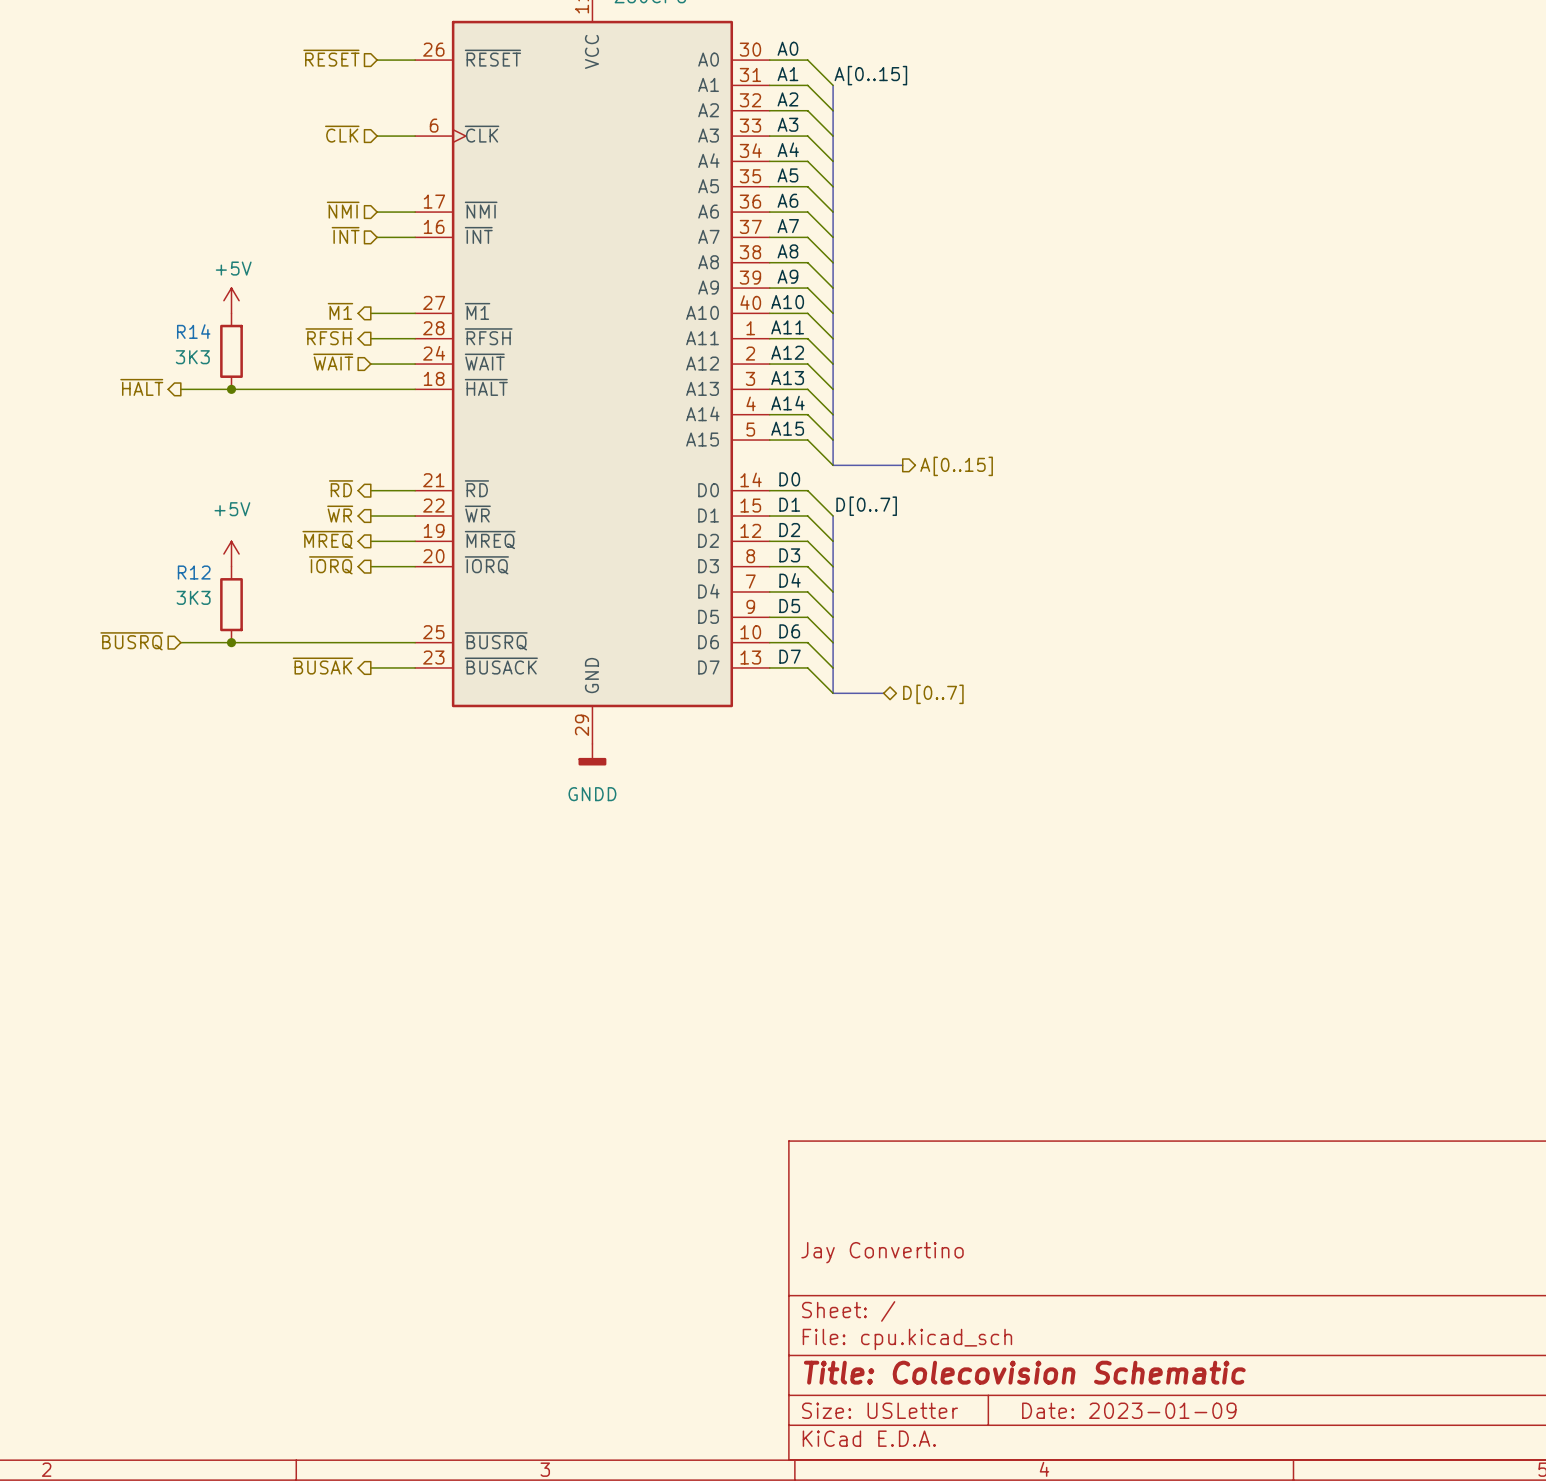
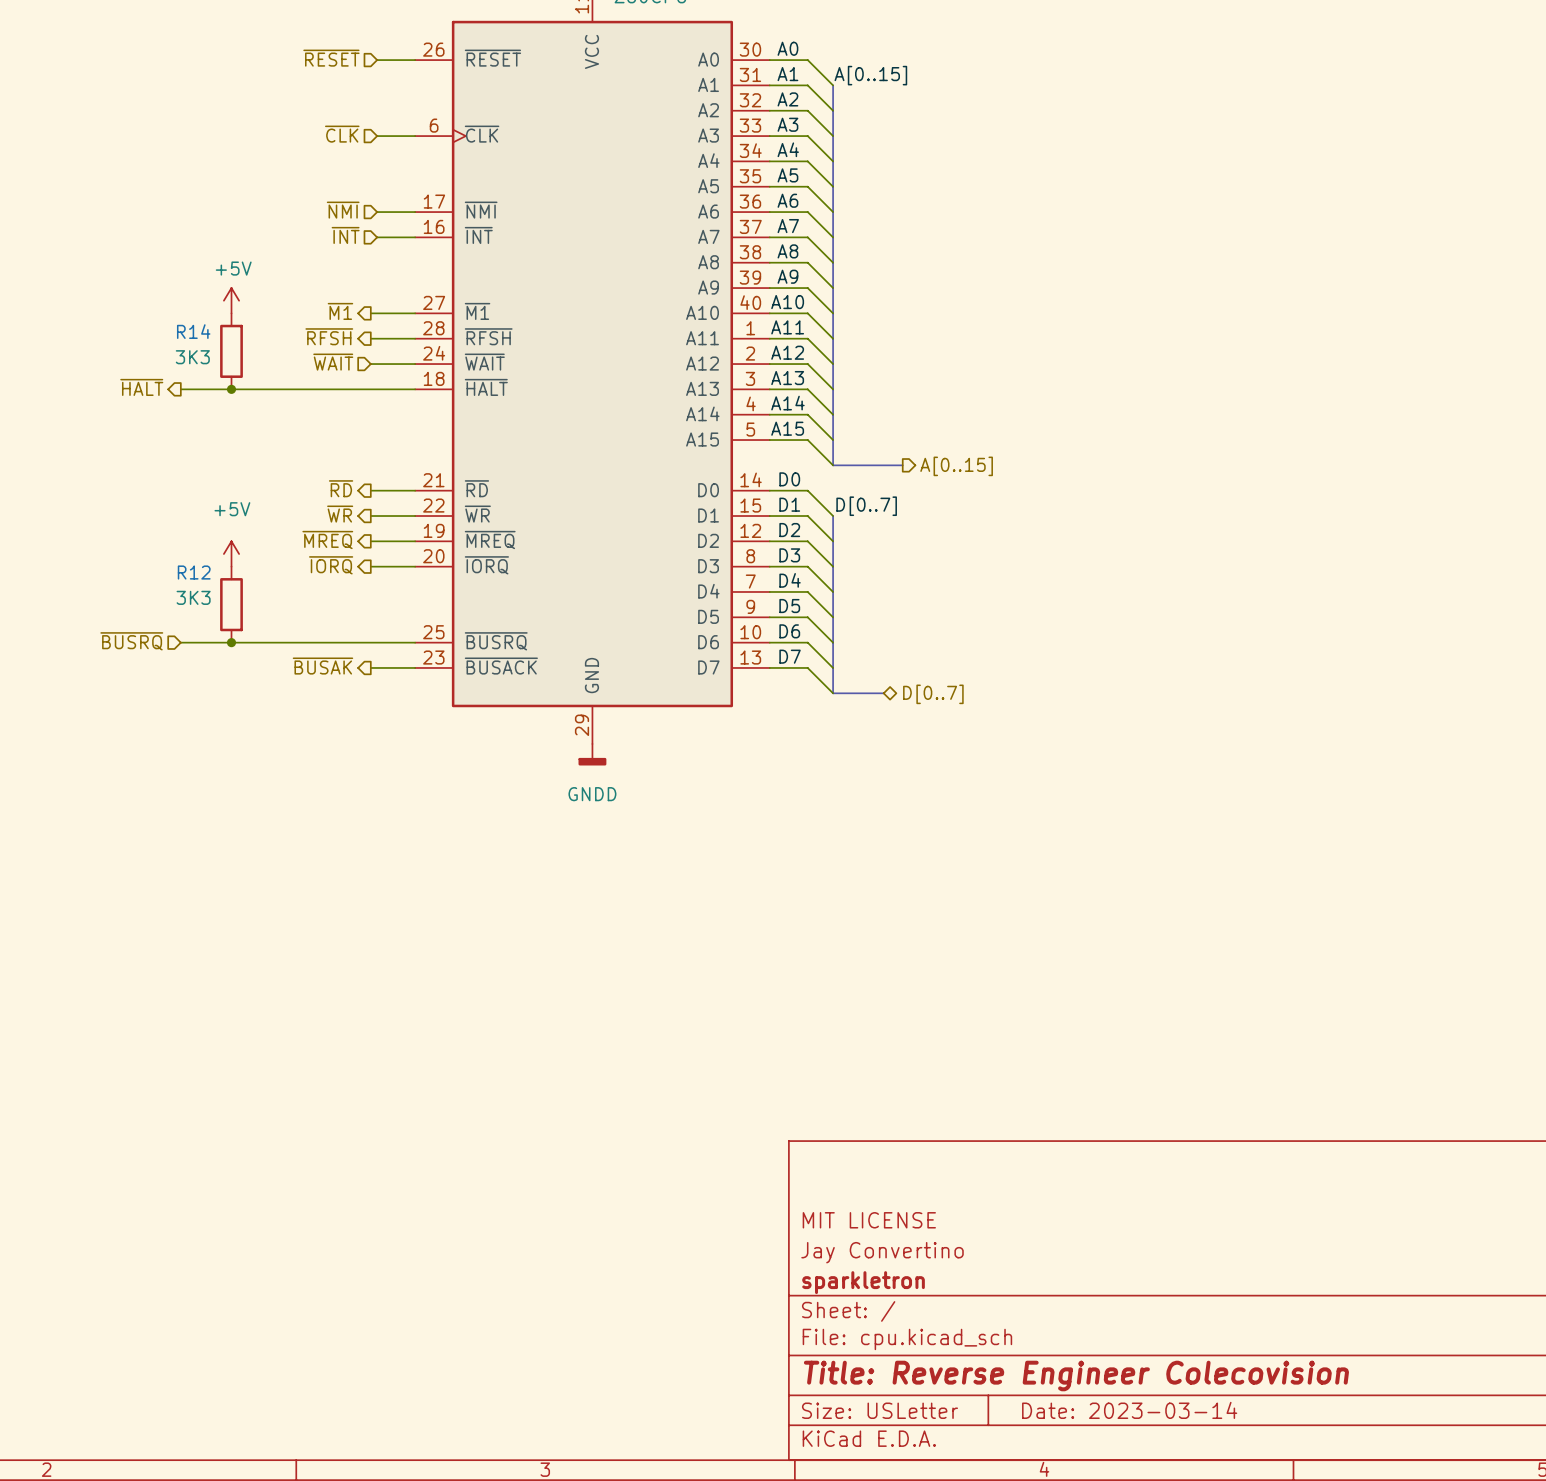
title block: none -> MIT LICENSE (869, 1220)
title block: none -> sparkletron (863, 1282)
title block: Title: Colecovision Schematic (1024, 1372) -> Title: Reverse Engineer Colecovision (1076, 1375)
title block: Date: 2023-01-09 (1129, 1410) -> Date: 2023-03-14 (1129, 1410)

